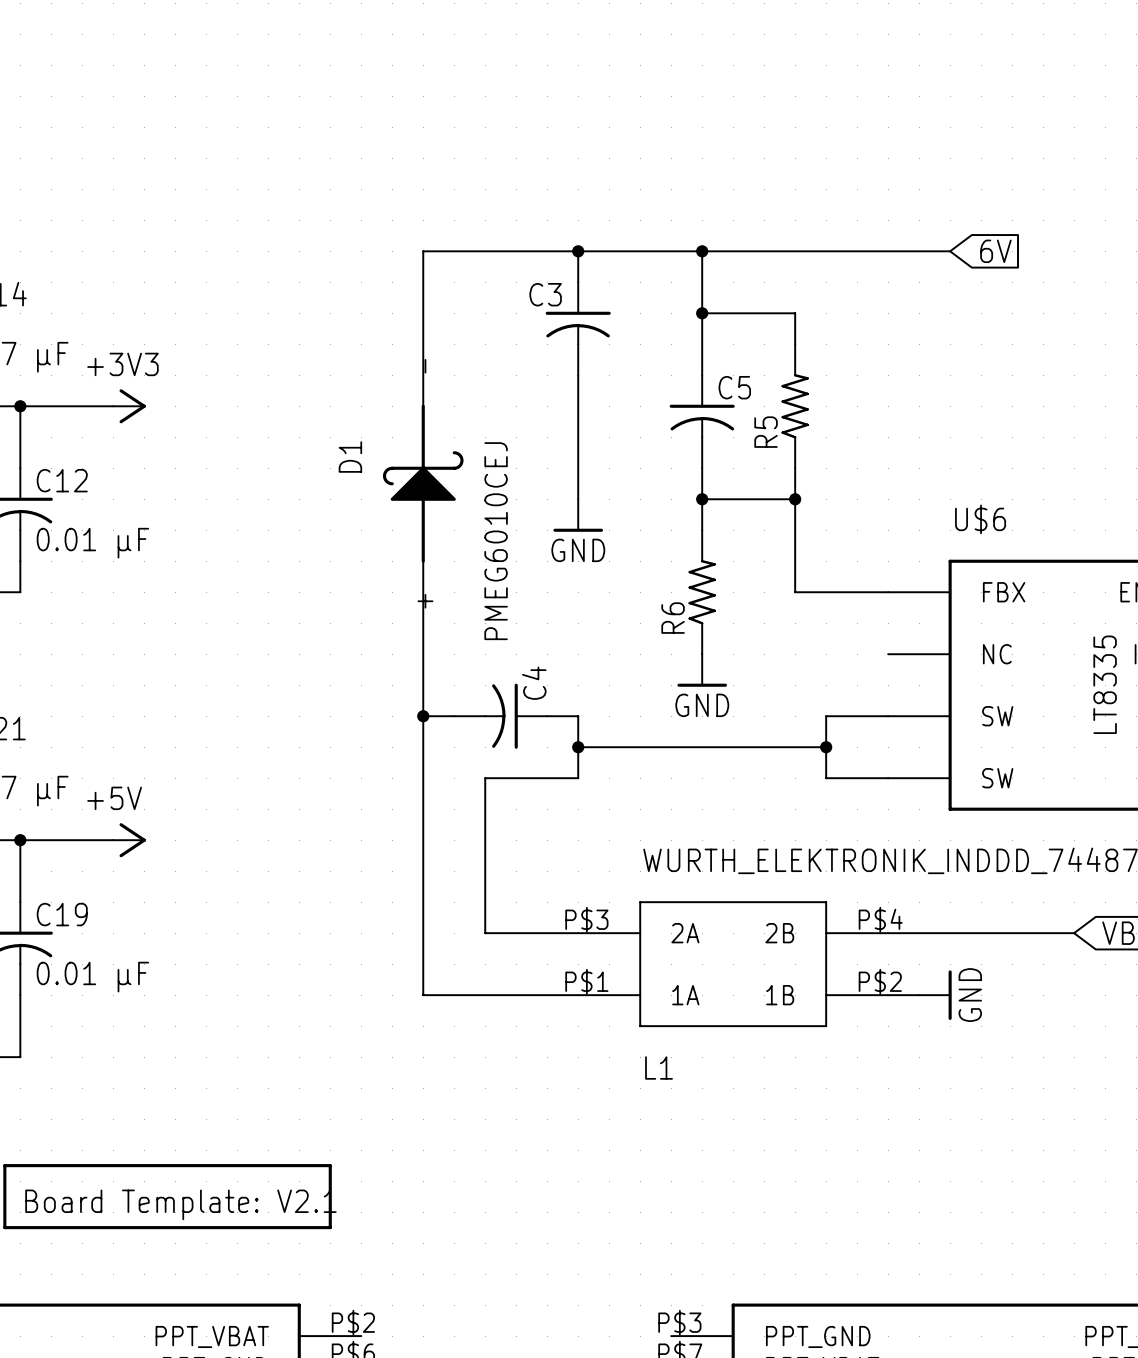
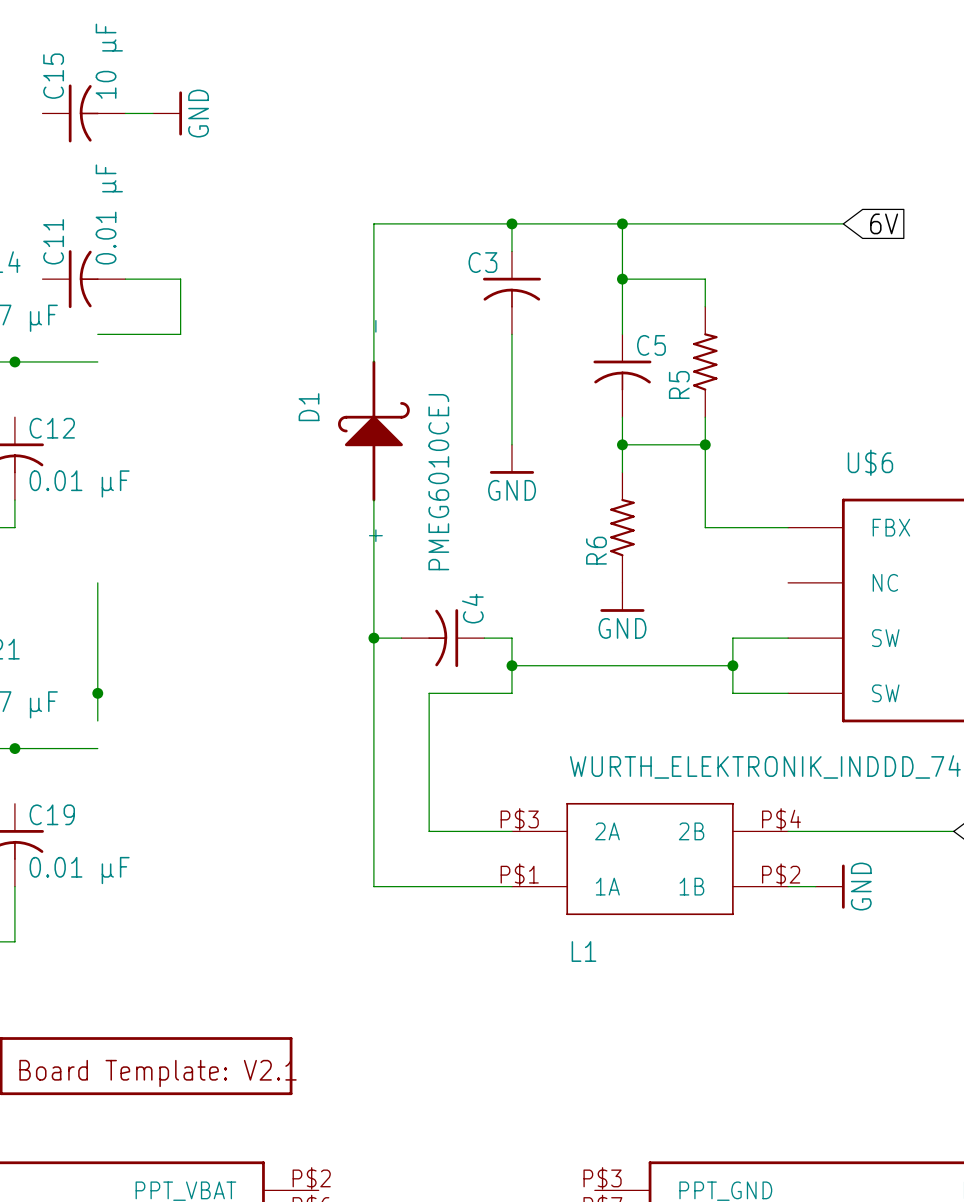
C15: none -> 10 μF (83, 113)
wire: none -> (125, 113) (153, 113)
power symbol: none -> GND (167, 113)
C11: none -> 0.01 μF (83, 279)
wire: none -> (125, 279) (180, 279) (180, 334) (97, 334)
wire: (20, 406) (20, 468) -> none
power symbol: +3V3 (129, 406) -> none
wire: none -> (97, 582) (97, 720)
junction: none -> (97, 693)
wire: (20, 840) (20, 902) -> none
power symbol: +5V (129, 840) -> none

